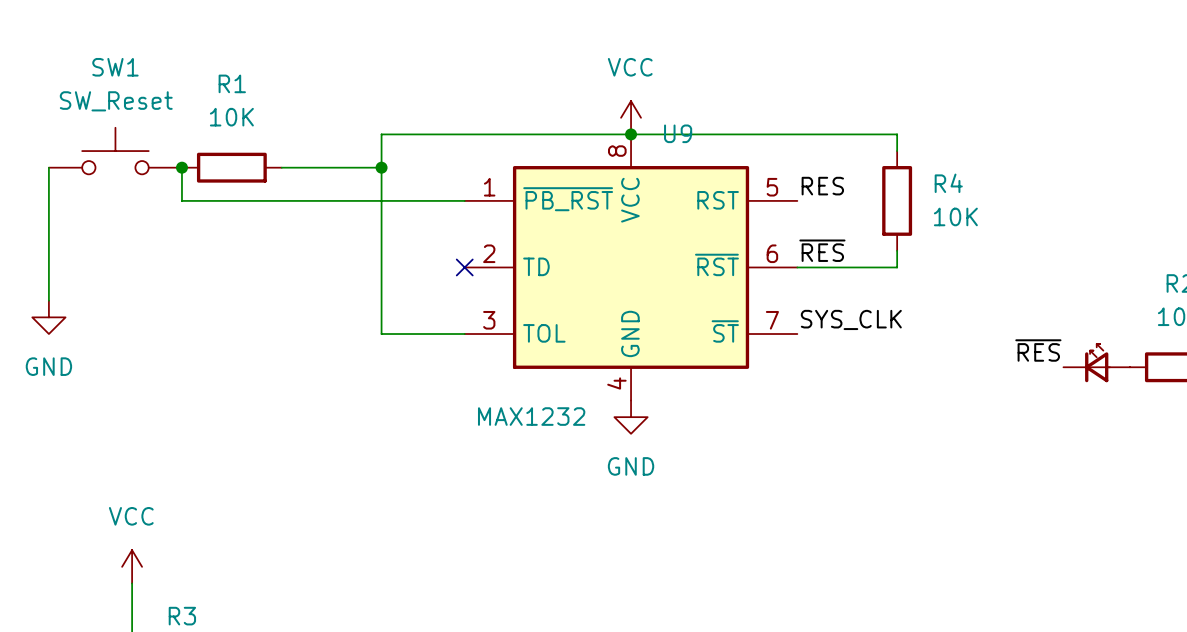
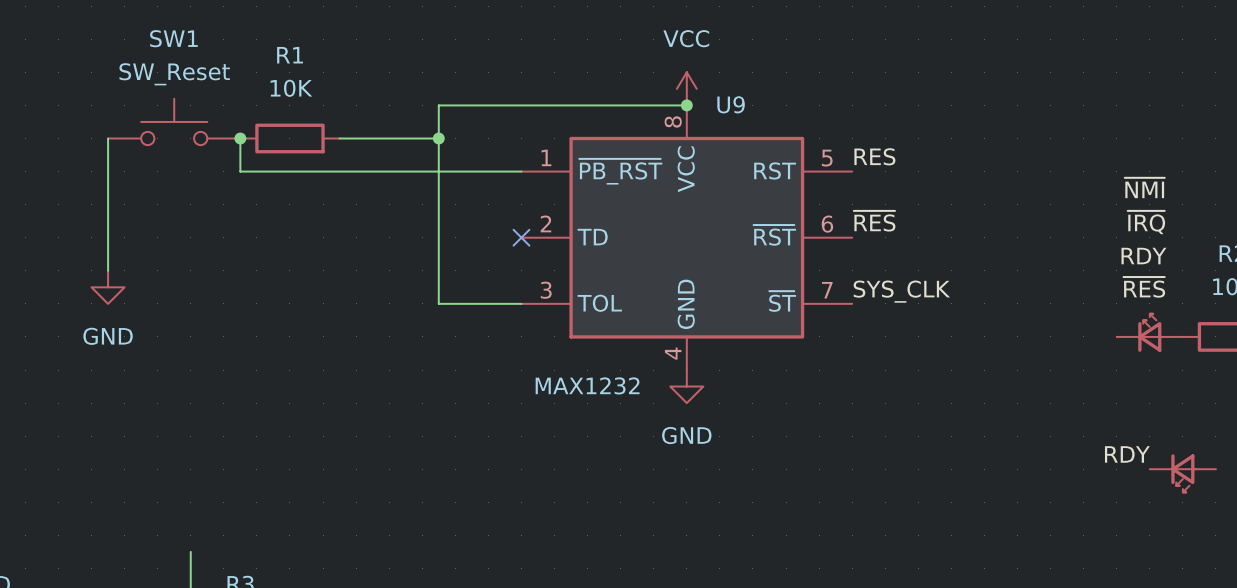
wire: (631, 134) (897, 134) (897, 151) -> none
R4: 10K (897, 200) -> none
label: none -> ~{NMI} (1144, 187)
wire: (897, 250) (897, 267) (797, 267) -> none
label: none -> ~{IRQ} (1146, 222)
label: none -> RDY (1143, 256)
label position: ~{RES} (1038, 350) -> ~{RES} (1144, 287)
label: none -> RDY (1127, 454)
part: none -> (1182, 473)
power symbol: VCC (132, 566) -> none

